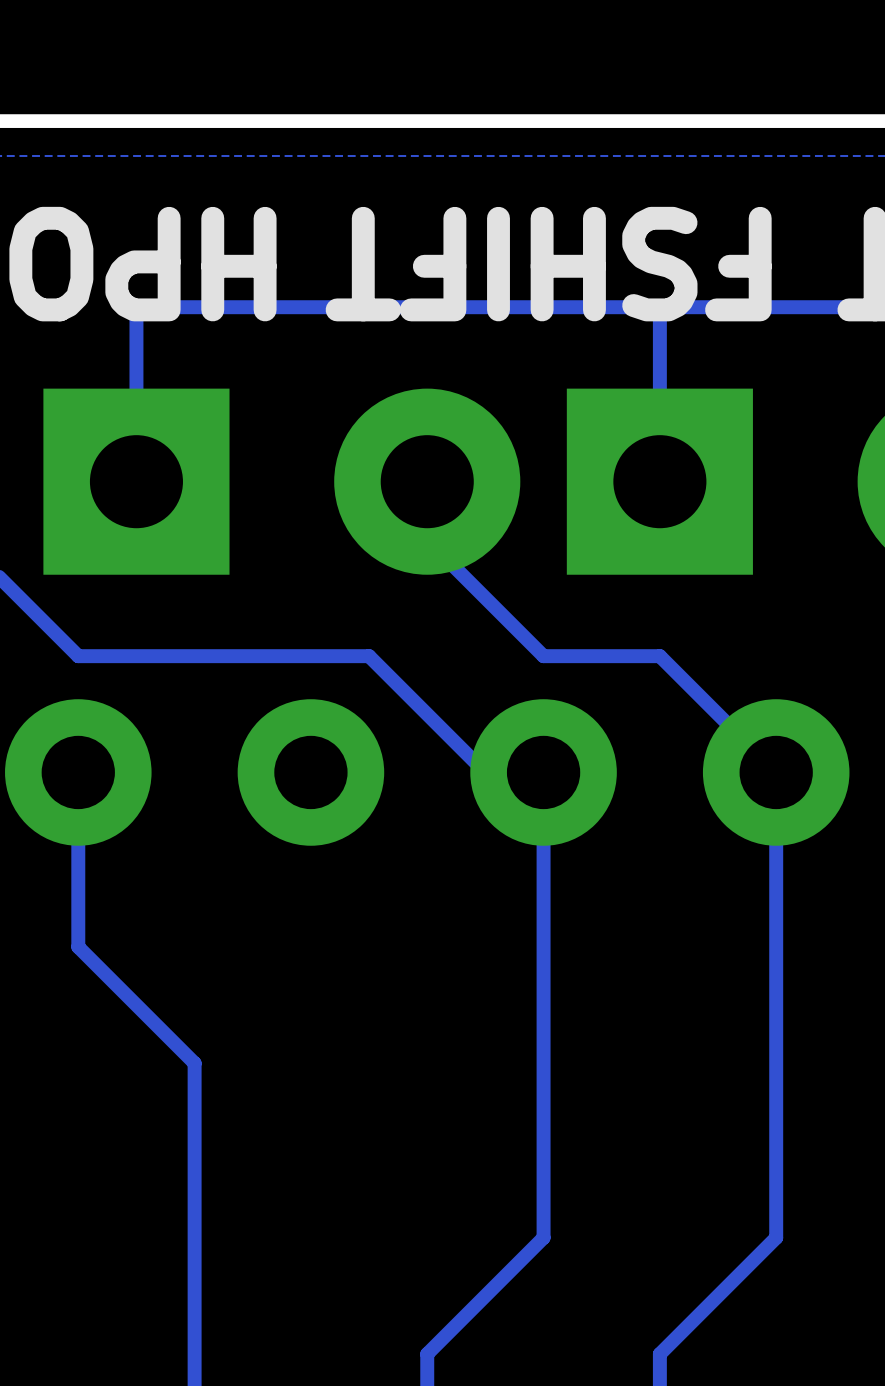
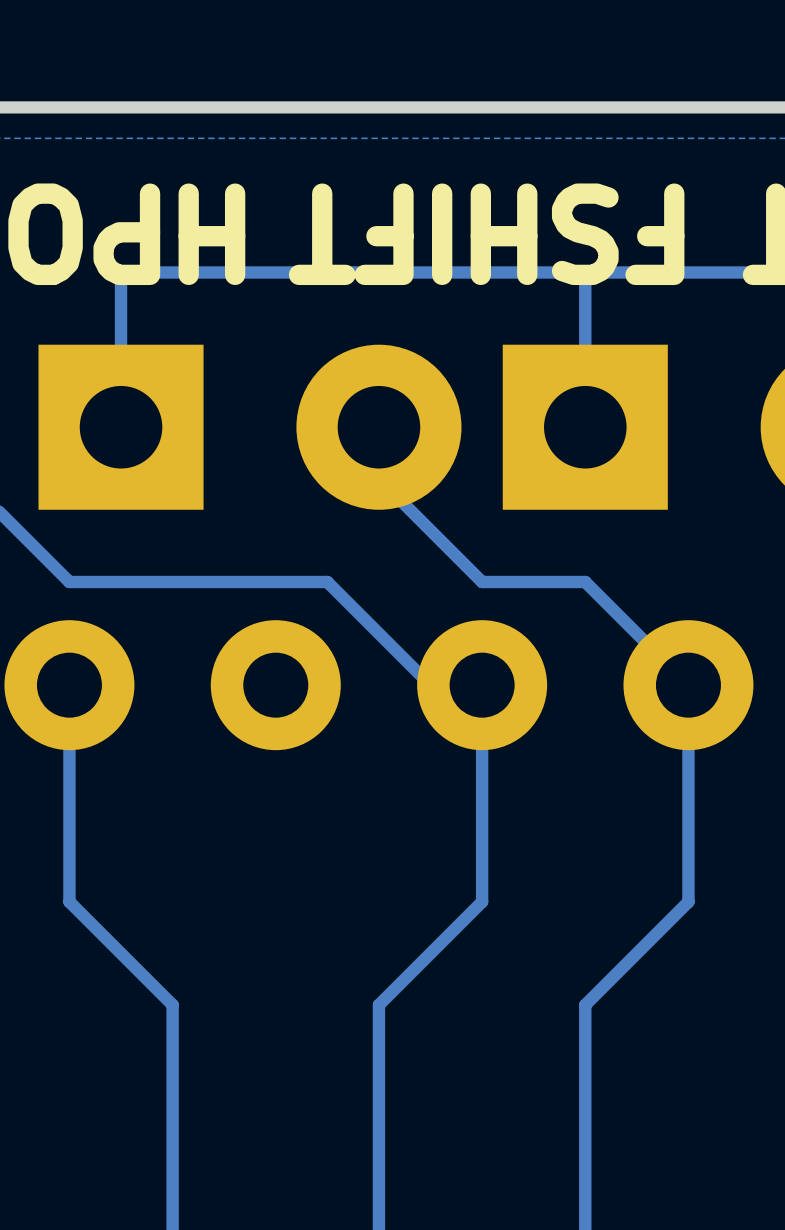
track: (78, 946) (194, 1063) (194, 1133) -> (69, 839) (69, 901) (172, 1004)
track: (543, 1016) (543, 1237) (427, 1354) -> (482, 901) (378, 1004) (378, 1201)
track: (776, 1016) (776, 1237) (659, 1354) -> (688, 901) (585, 1004) (585, 1201)

